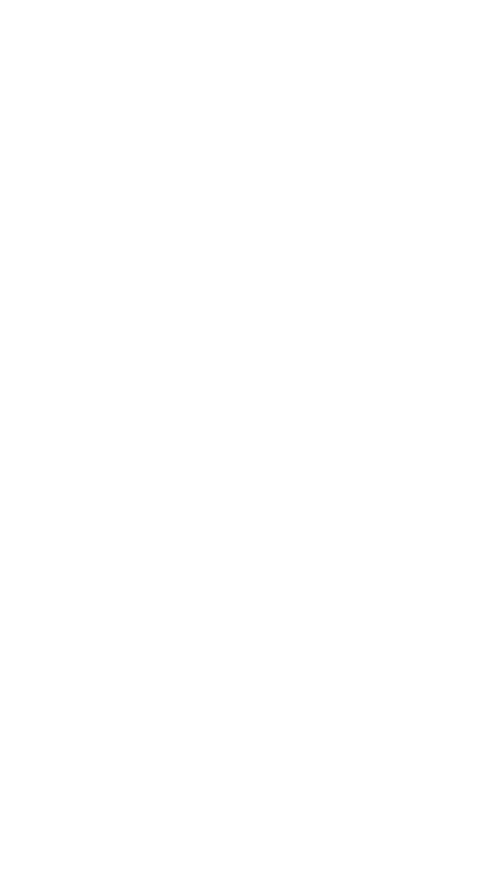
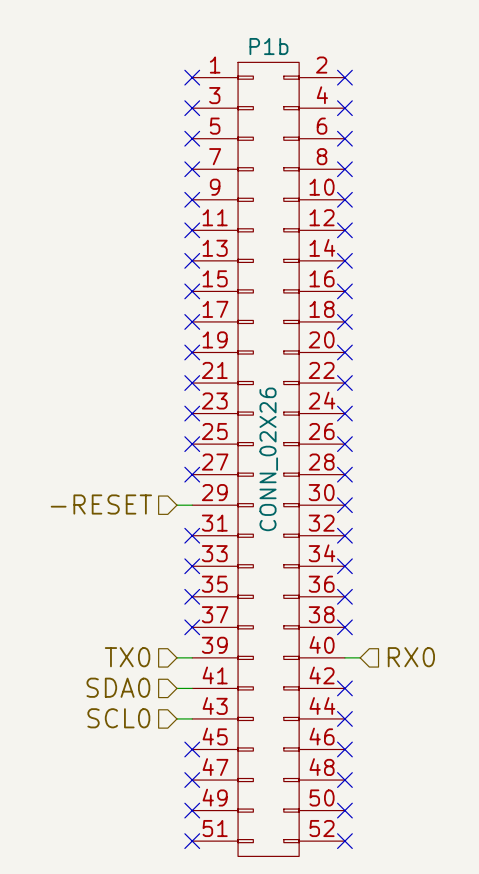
no-connect mark: none -> (192, 77)
no-connect mark: none -> (344, 77)
no-connect mark: none -> (192, 108)
no-connect mark: none -> (344, 108)
no-connect mark: none -> (192, 138)
no-connect mark: none -> (344, 138)
no-connect mark: none -> (192, 169)
no-connect mark: none -> (344, 169)
no-connect mark: none -> (192, 199)
no-connect mark: none -> (344, 199)
no-connect mark: none -> (192, 230)
no-connect mark: none -> (344, 230)
no-connect mark: none -> (192, 260)
no-connect mark: none -> (344, 260)
no-connect mark: none -> (192, 291)
no-connect mark: none -> (344, 291)
no-connect mark: none -> (192, 321)
no-connect mark: none -> (344, 321)
no-connect mark: none -> (192, 352)
no-connect mark: none -> (344, 352)
no-connect mark: none -> (192, 383)
no-connect mark: none -> (344, 383)
no-connect mark: none -> (192, 413)
no-connect mark: none -> (344, 413)
no-connect mark: none -> (192, 444)
no-connect mark: none -> (344, 444)
P1b: none -> CONN_02X26 (268, 459)
no-connect mark: none -> (192, 474)
no-connect mark: none -> (344, 474)
hierarchical label: none -> -RESET (101, 504)
wire: none -> (176, 505) (192, 505)
no-connect mark: none -> (344, 505)
no-connect mark: none -> (192, 535)
no-connect mark: none -> (344, 535)
no-connect mark: none -> (192, 566)
no-connect mark: none -> (344, 566)
no-connect mark: none -> (192, 596)
no-connect mark: none -> (344, 596)
no-connect mark: none -> (192, 627)
no-connect mark: none -> (344, 627)
hierarchical label: none -> TX0 (127, 657)
wire: none -> (176, 657) (192, 657)
wire: none -> (344, 657) (360, 657)
hierarchical label: none -> RX0 (411, 657)
hierarchical label: none -> SDA0 (118, 687)
wire: none -> (176, 688) (192, 688)
no-connect mark: none -> (344, 688)
hierarchical label: none -> SCL0 (118, 718)
wire: none -> (176, 718) (192, 718)
no-connect mark: none -> (344, 718)
no-connect mark: none -> (192, 749)
no-connect mark: none -> (344, 749)
no-connect mark: none -> (192, 780)
no-connect mark: none -> (344, 780)
no-connect mark: none -> (192, 810)
no-connect mark: none -> (344, 810)
no-connect mark: none -> (192, 841)
no-connect mark: none -> (344, 841)

